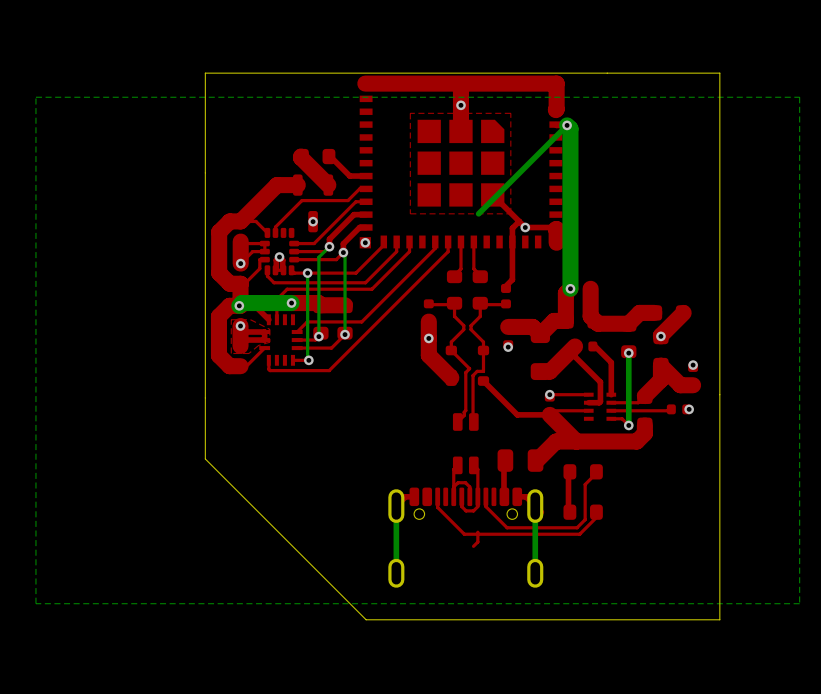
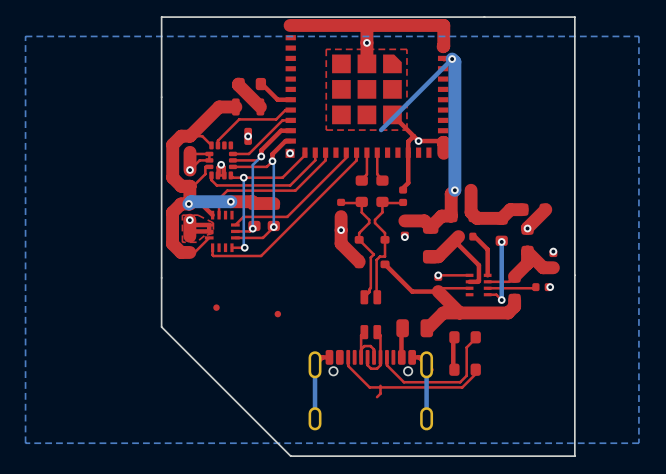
part: none -> (216, 307)
part: none -> (277, 314)

